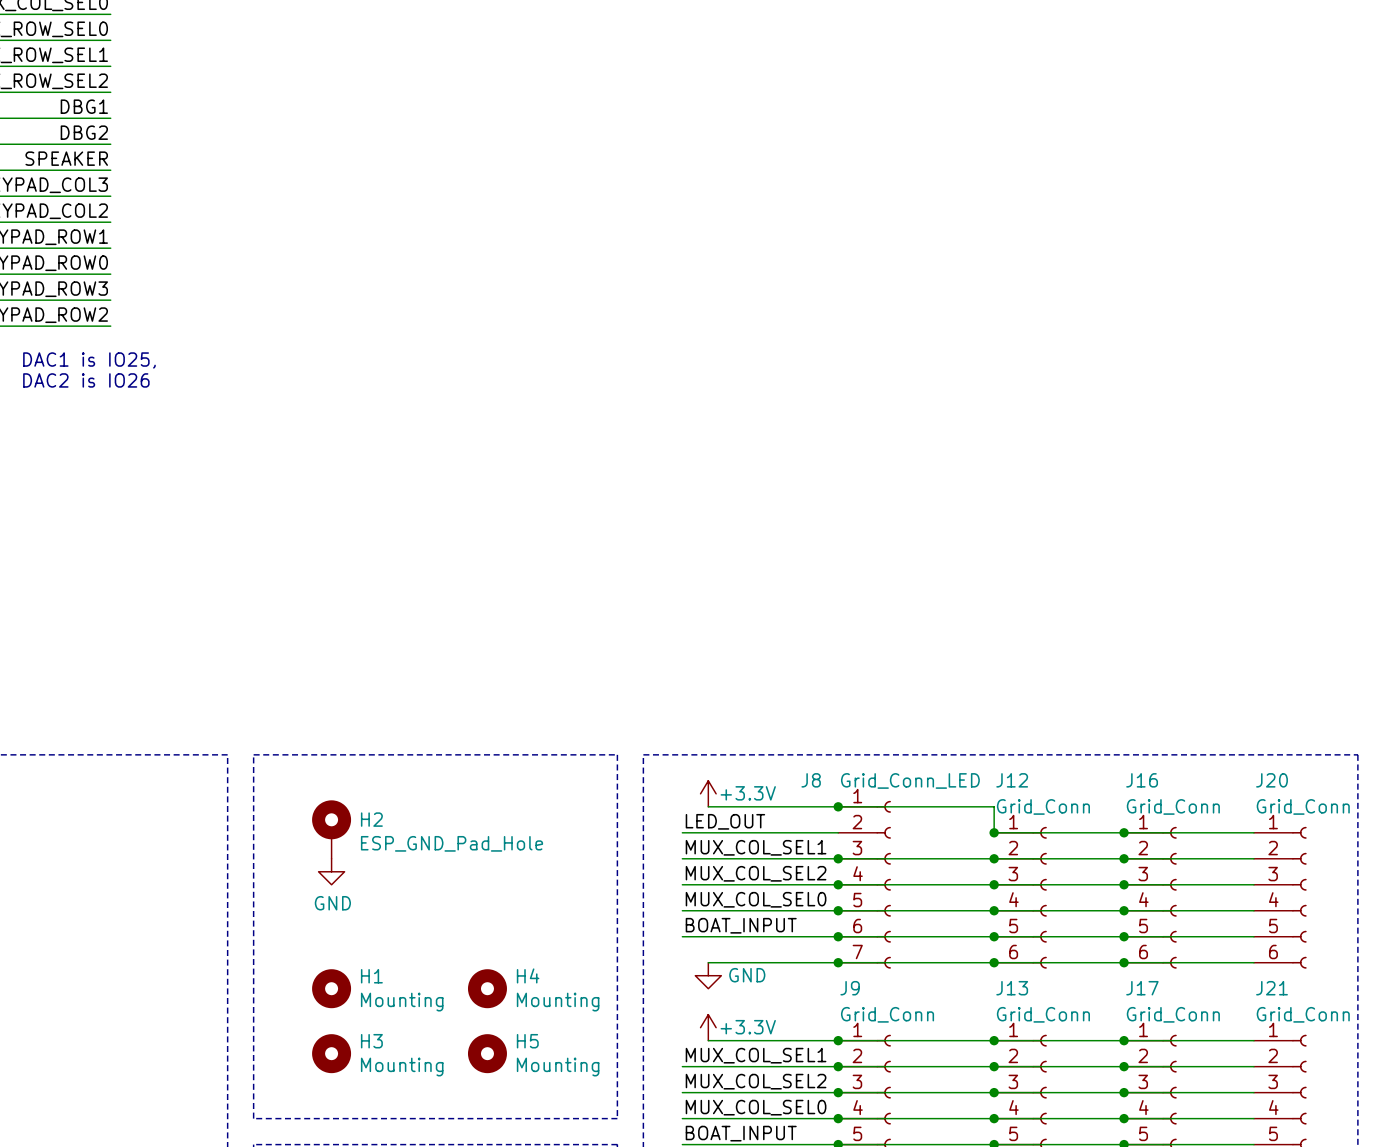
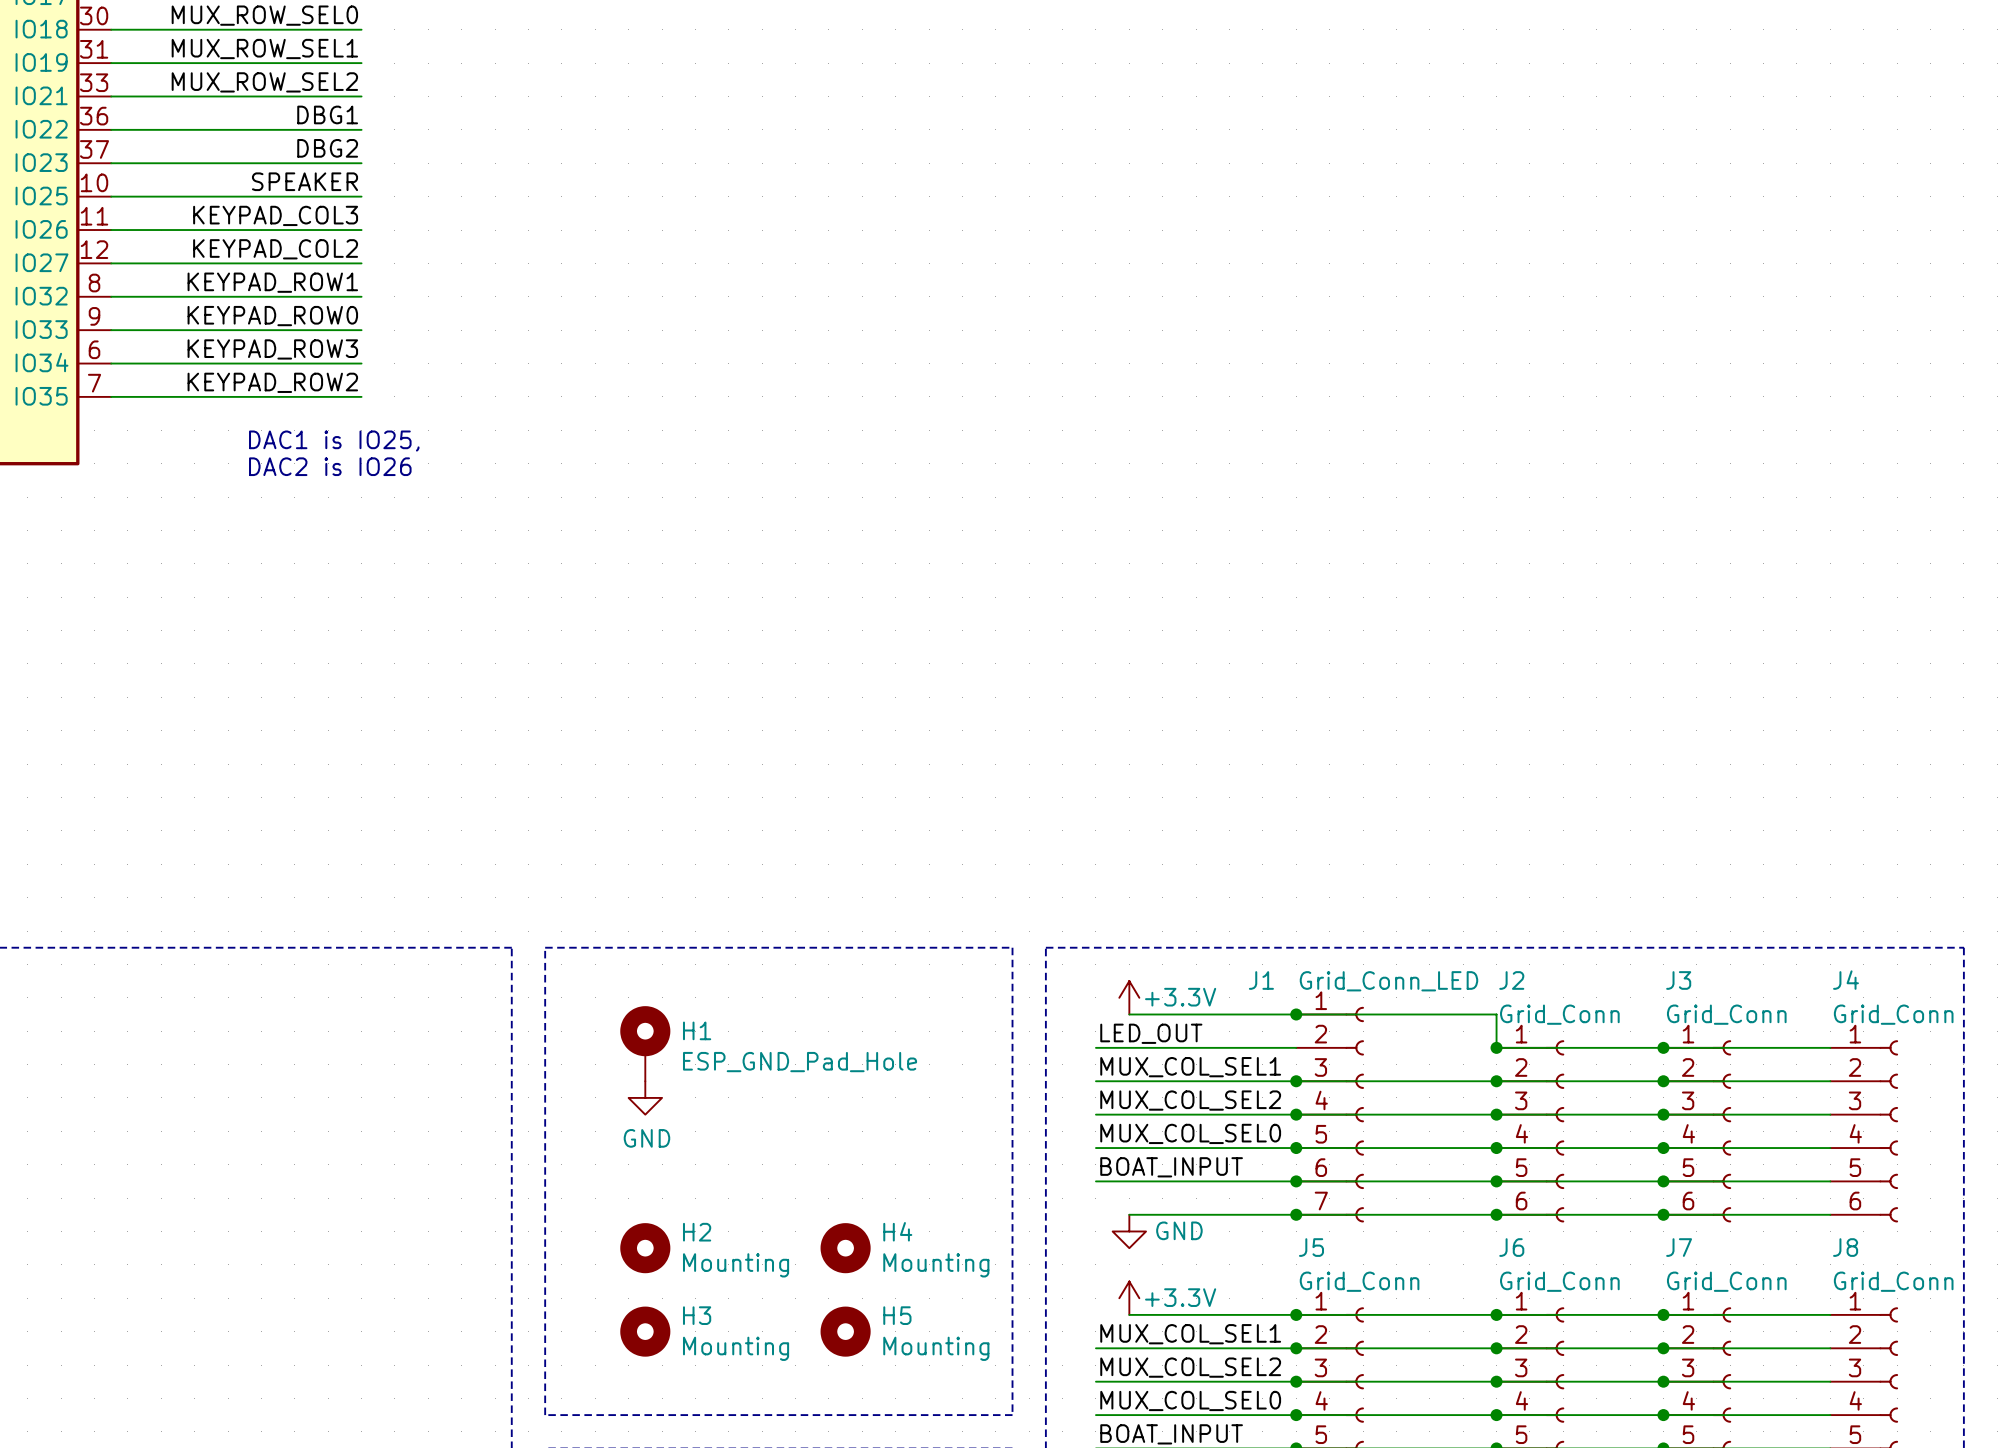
J8 name: J8 (811, 780) -> J1 (1261, 980)
J12 name: J12 (1012, 780) -> J2 (1511, 980)
J16 name: J16 (1142, 780) -> J3 (1678, 980)
J20 name: J20 (1272, 780) -> J4 (1845, 980)
H2 name: H2 (371, 819) -> H1 (697, 1030)
H1 name: H1 (371, 976) -> H2 (697, 1232)
J9 name: J9 (850, 988) -> J5 (1311, 1247)
J13 name: J13 (1012, 988) -> J6 (1511, 1247)
J17 name: J17 (1142, 988) -> J7 (1679, 1247)
J21 name: J21 (1272, 988) -> J8 (1845, 1247)

